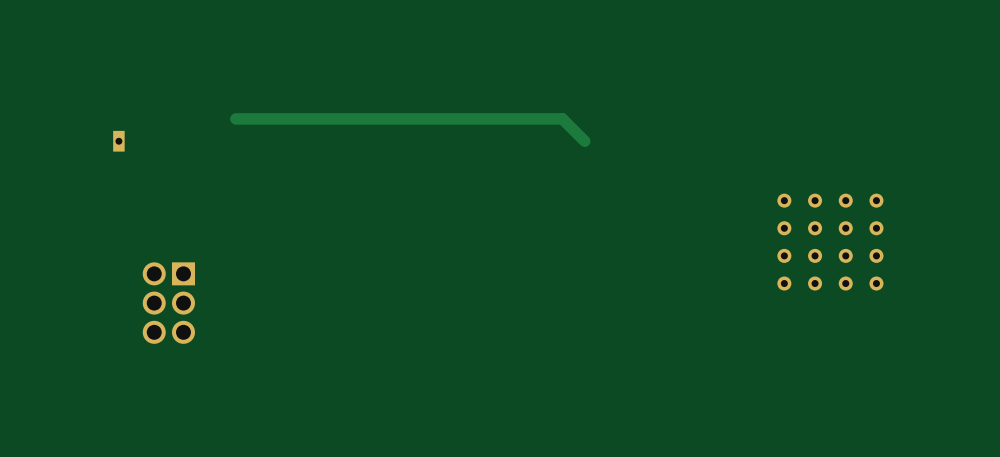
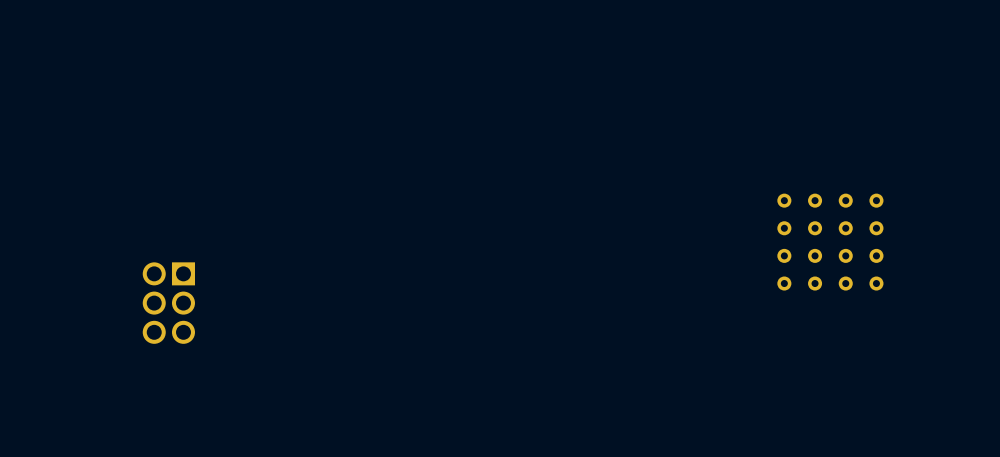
track: (235, 118) (562, 118) (584, 141) -> none
part: (118, 141) -> none

